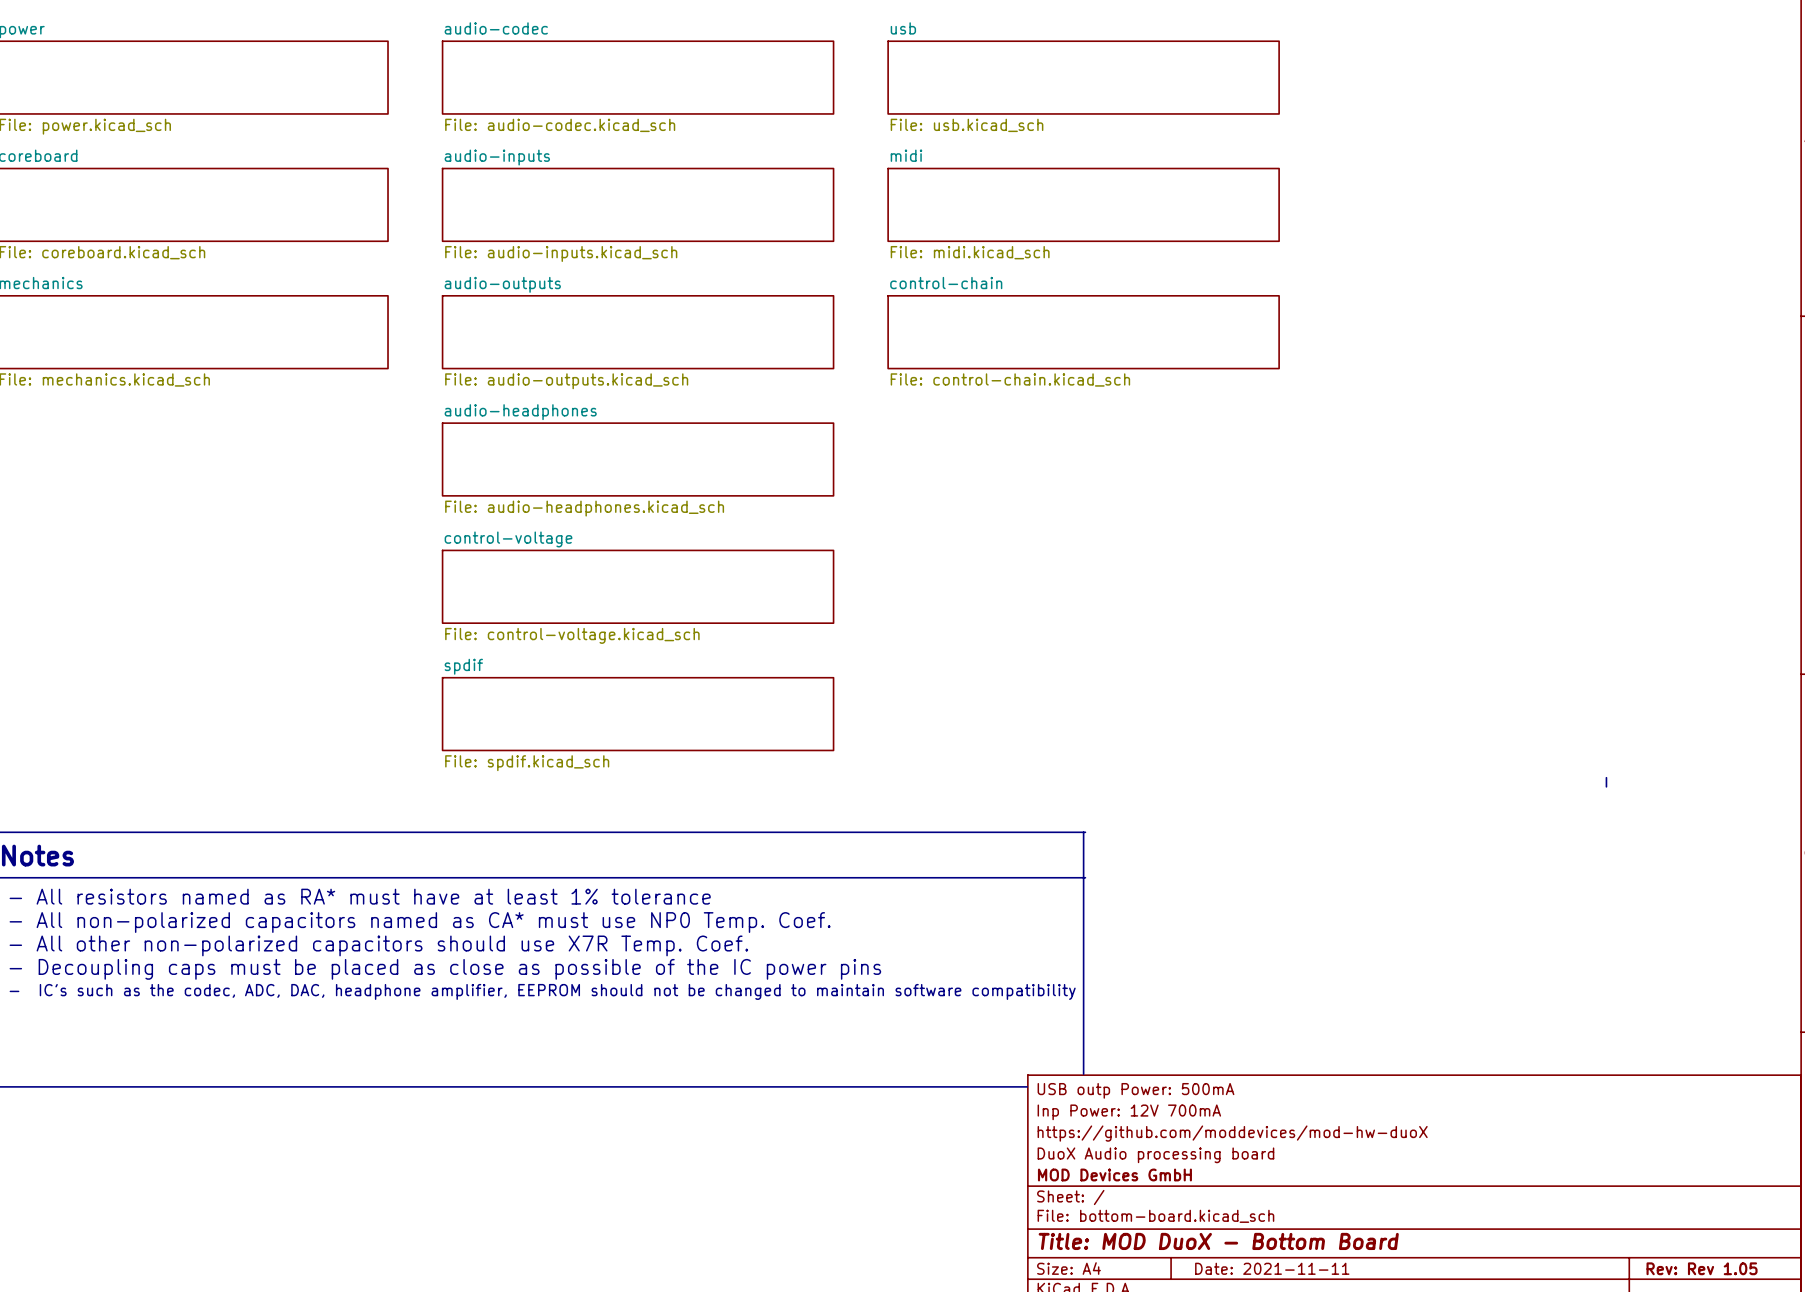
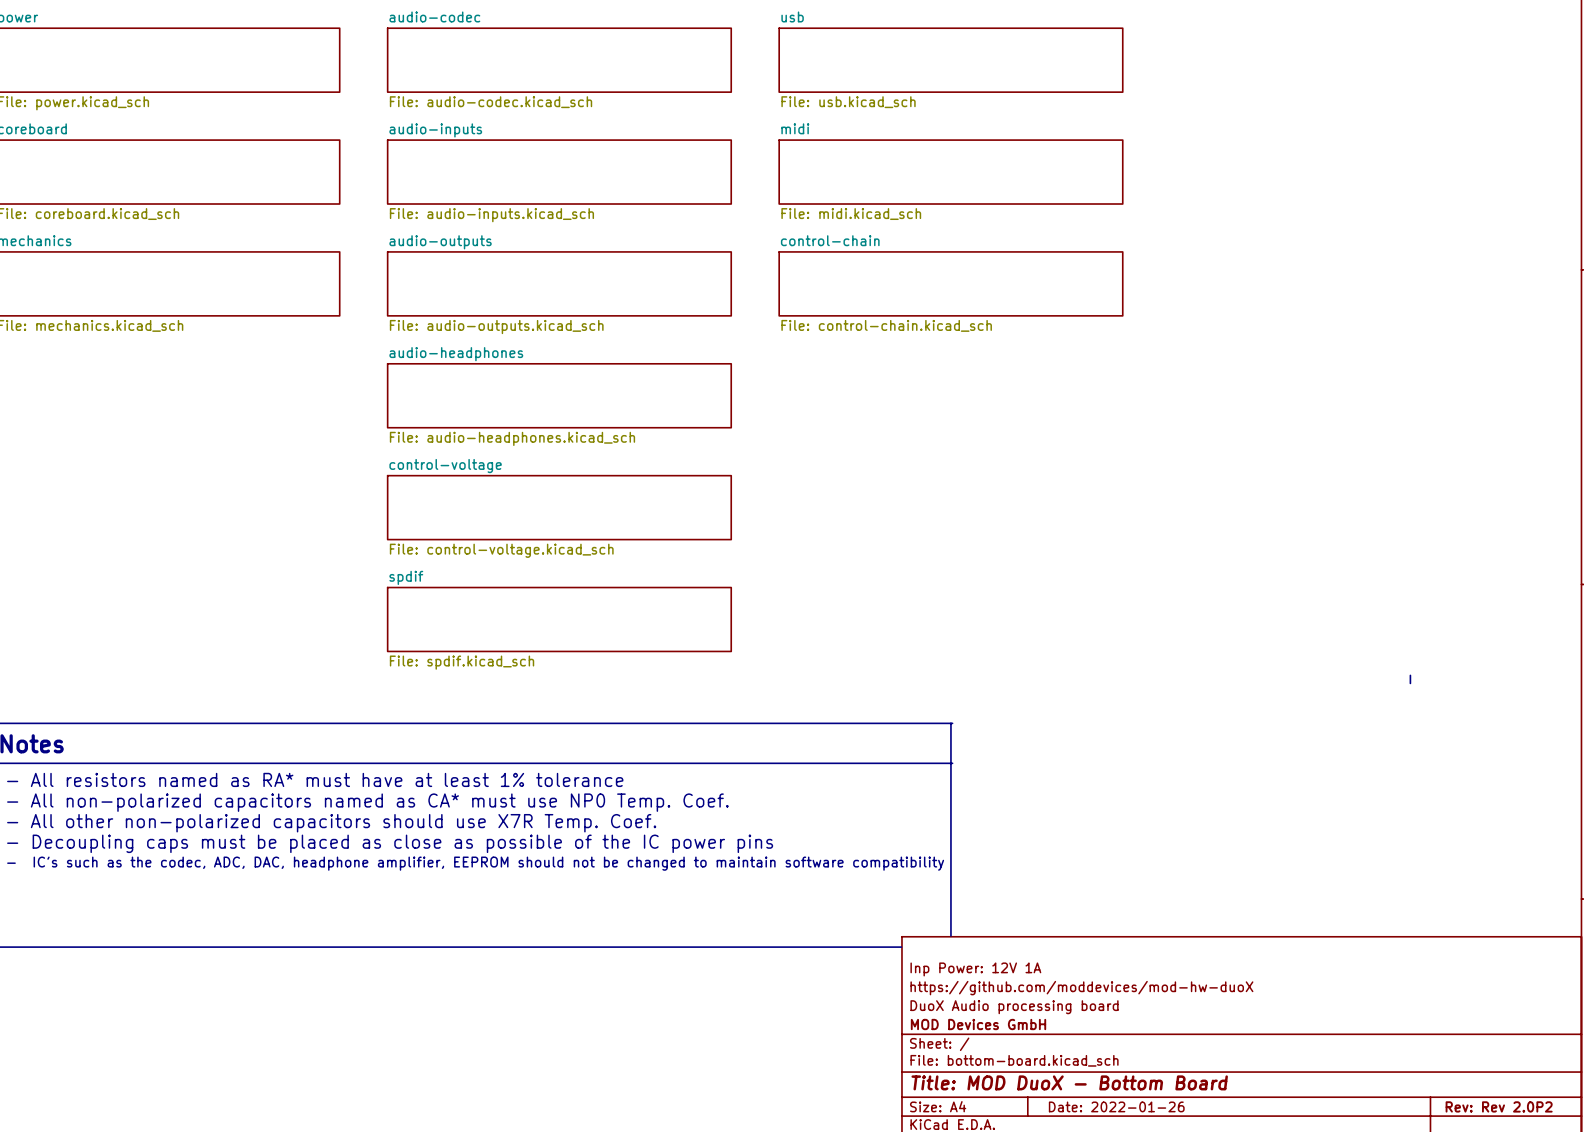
title block: USB outp Power: 500mA (1135, 1090) -> none
title block: Inp Power: 12V 700mA (1129, 1112) -> Inp Power: 12V 1A (975, 969)
title block: Date: 2021-11-11 (1272, 1268) -> Date: 2022-01-26 (1116, 1106)
title block: Rev: Rev 1.05 (1702, 1268) -> Rev: Rev 2.0P2 (1499, 1106)

